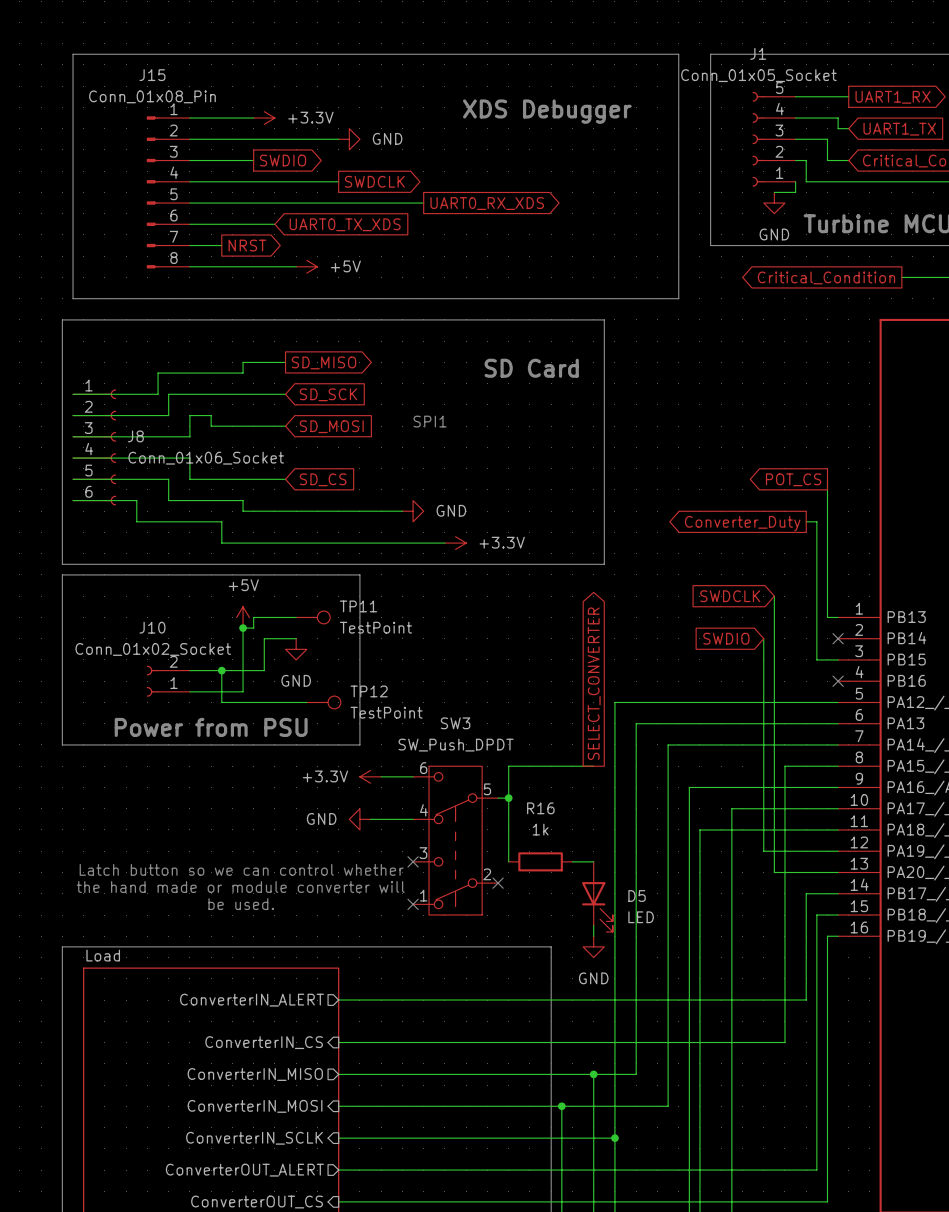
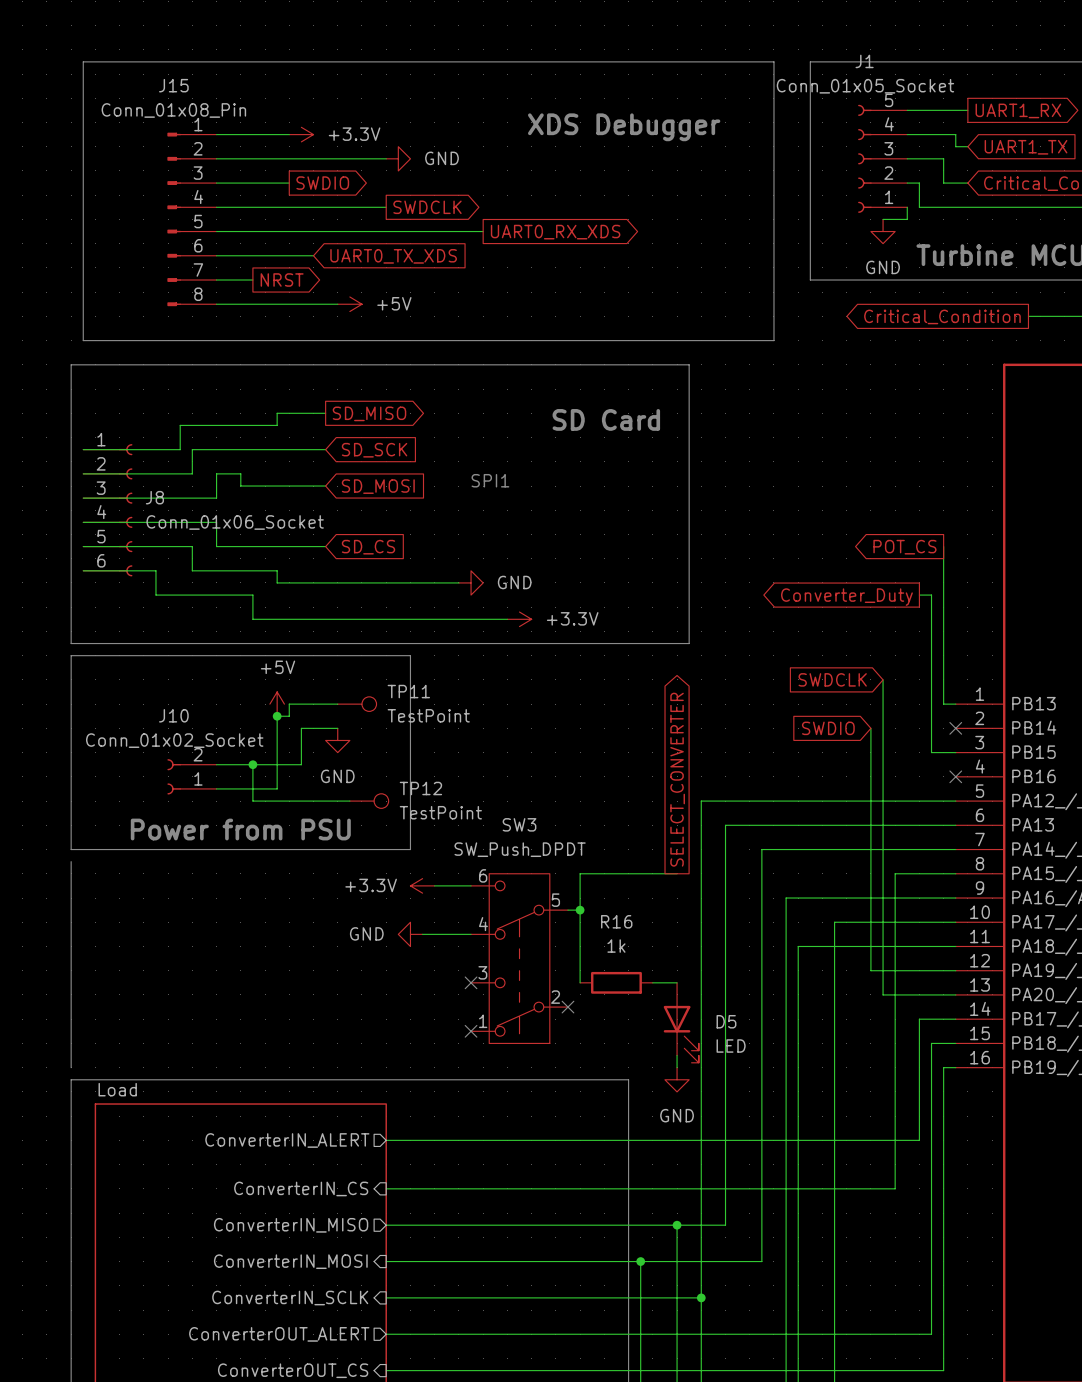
line: none -> (71, 861) (71, 1067)
text: Latch button so we can control whether (241, 869) -> none
text: the hand made or module converter will (240, 887) -> none
text: be used. (241, 904) -> none

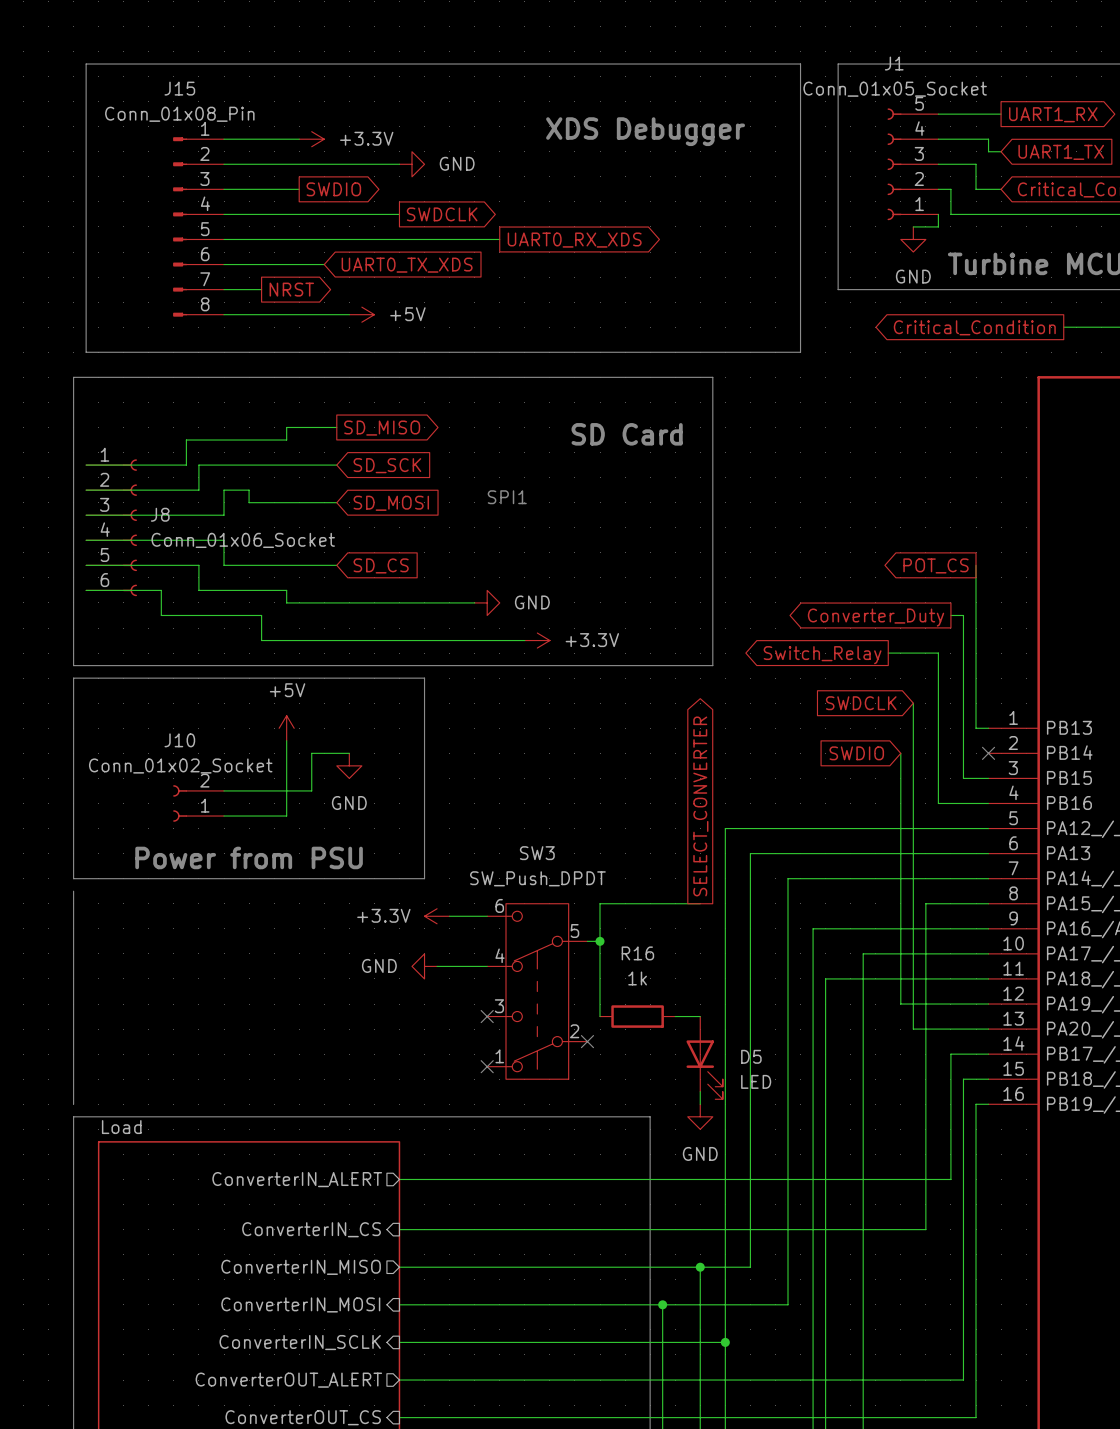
wire: none -> (888, 653) (938, 653) (938, 803) (988, 803)
global label: none -> Switch_Relay (822, 655)
wire: (337, 704) (289, 704) (289, 716) (277, 716) -> none
TP11: TestPoint (357, 704) -> none
junction: (277, 716) -> none
wire: (252, 764) (252, 801) (349, 801) -> none
junction: (252, 764) -> none
no-connect mark: (955, 776) -> none
TP12: TestPoint (369, 801) -> none

